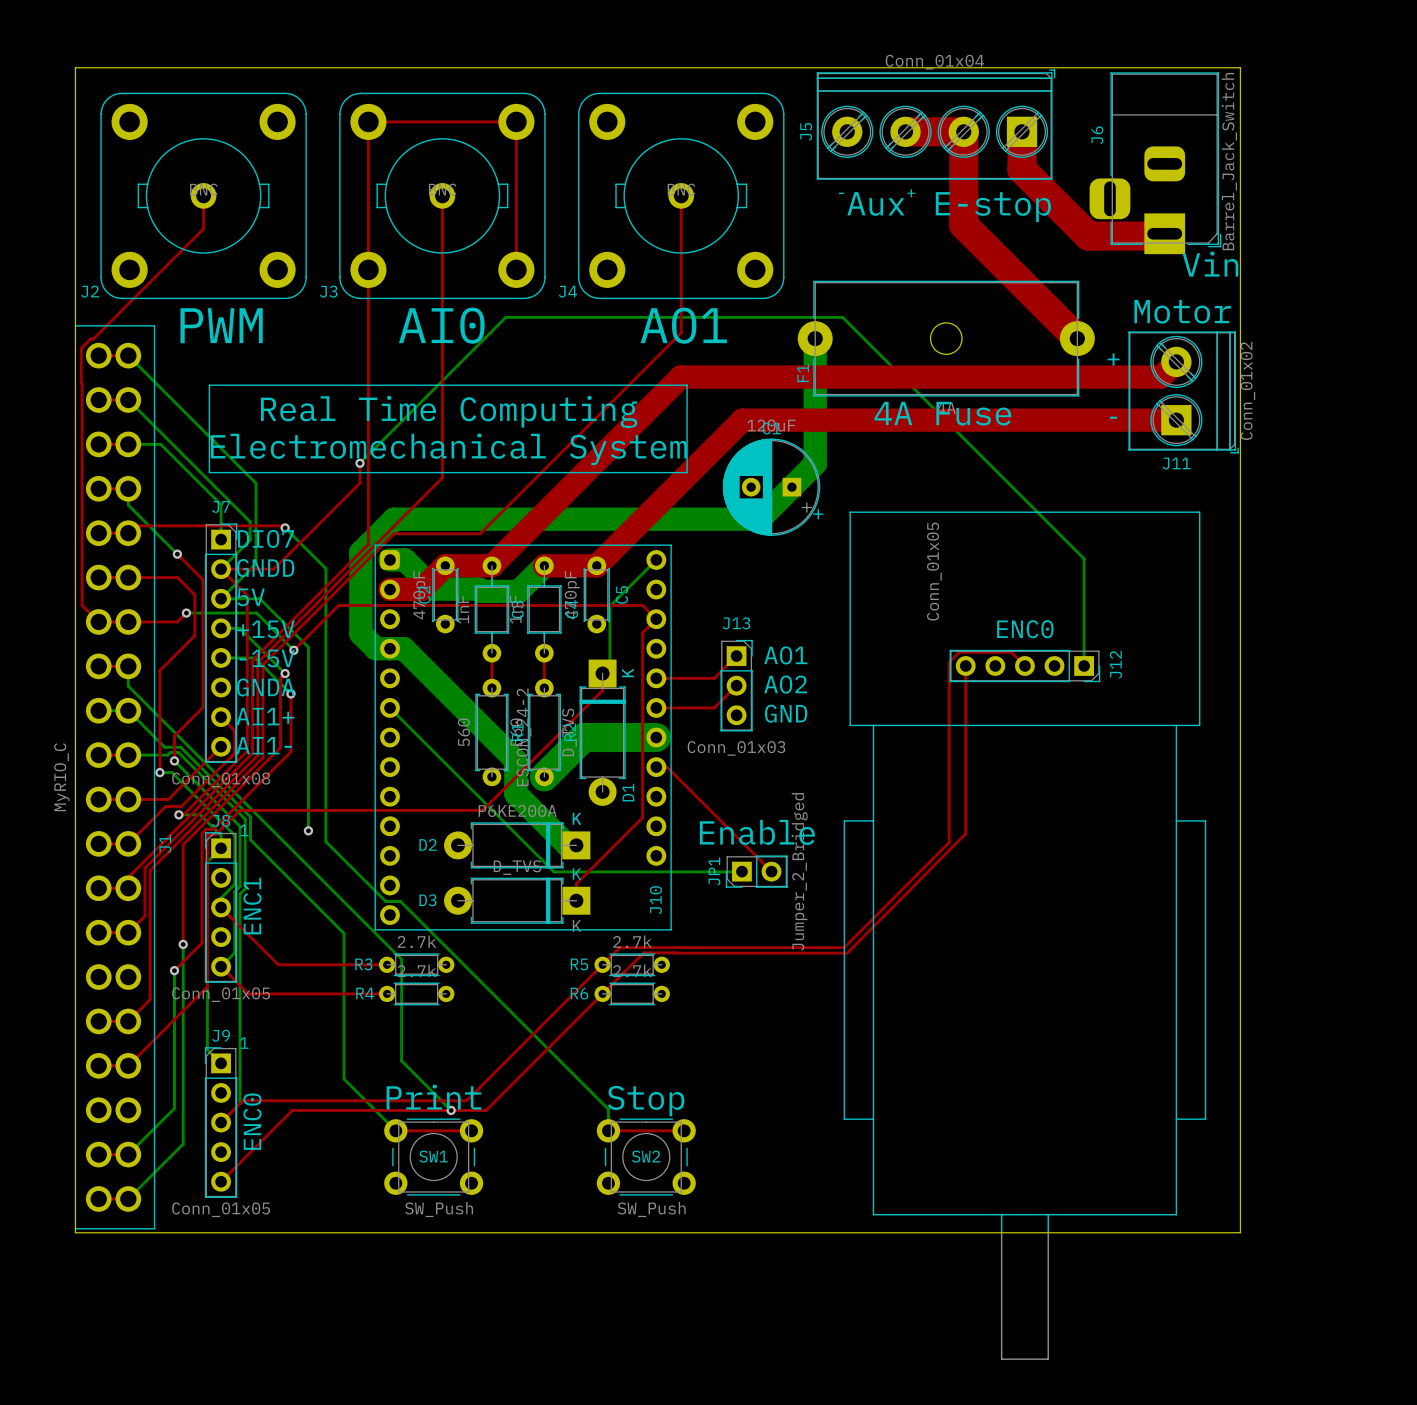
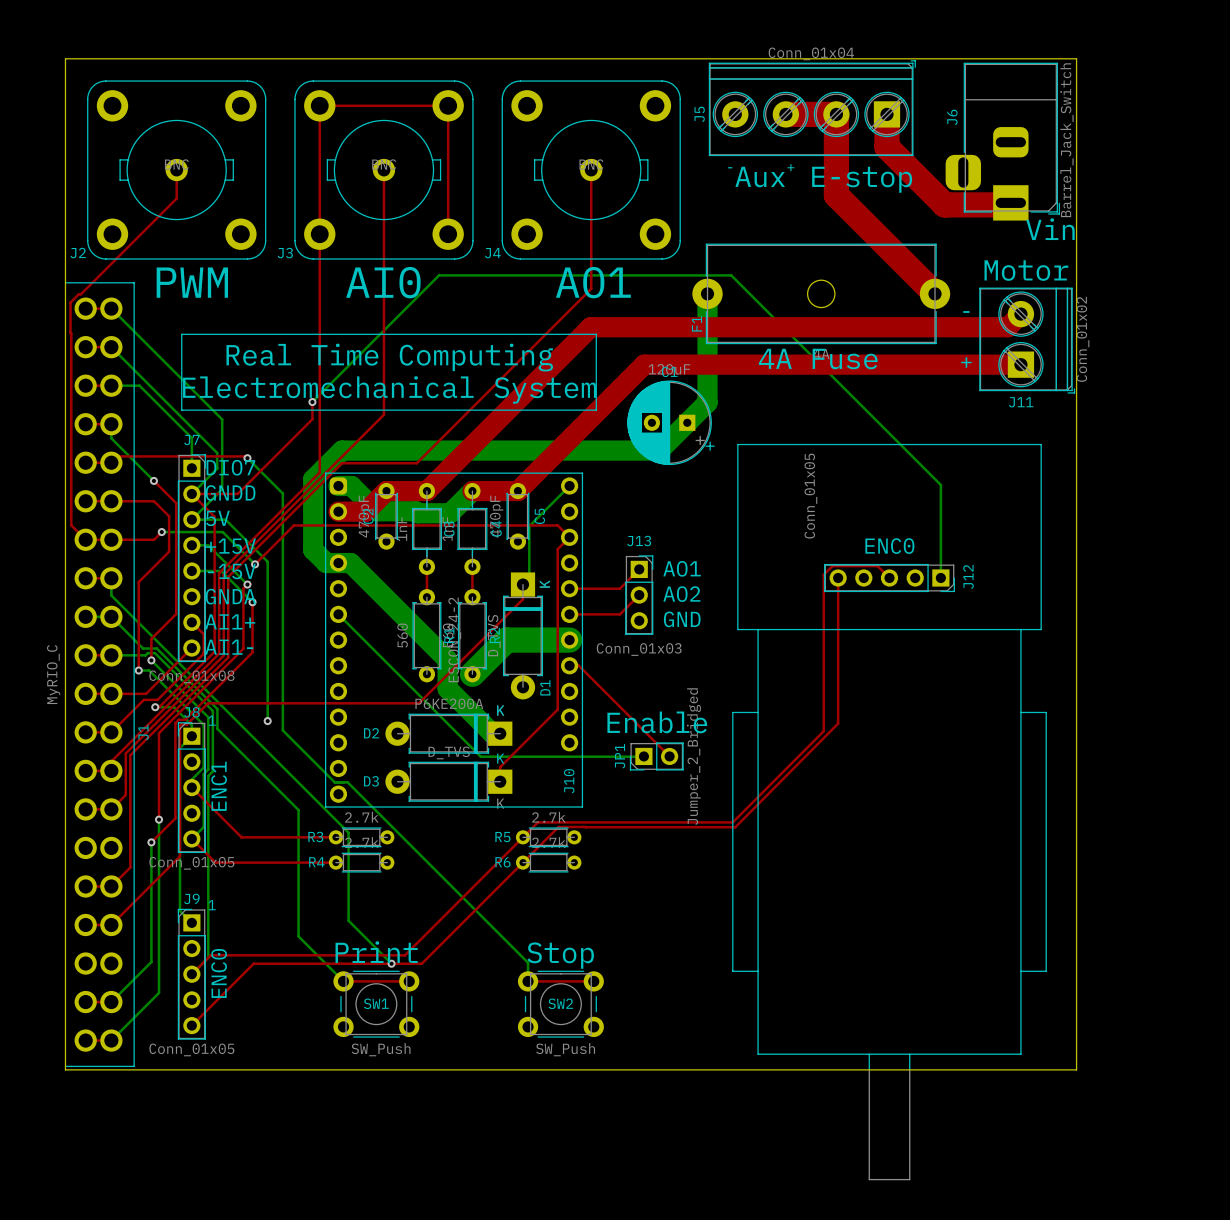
text: + (1113, 359) -> - (966, 311)
text: - (1113, 417) -> + (966, 362)

